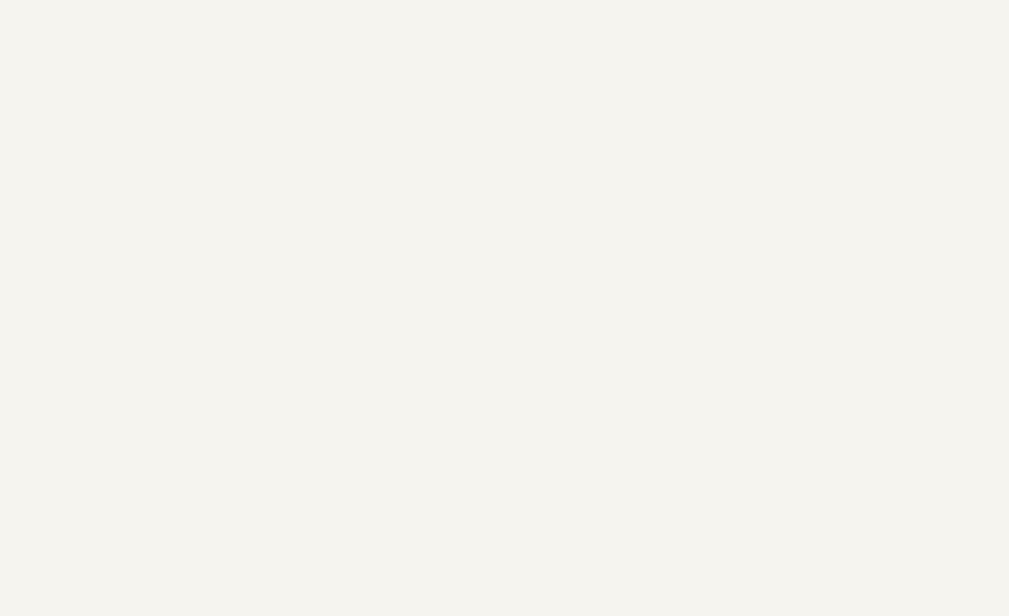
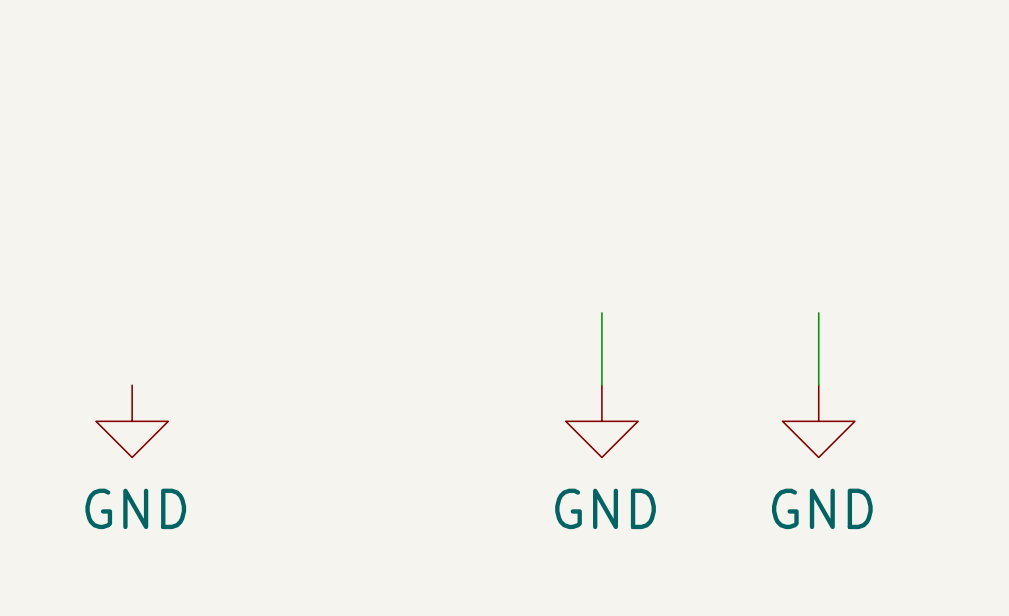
wire: none -> (601, 312) (601, 385)
wire: none -> (818, 312) (818, 385)
power symbol: none -> GND (132, 421)
power symbol: none -> GND (601, 421)
power symbol: none -> GND (818, 421)

